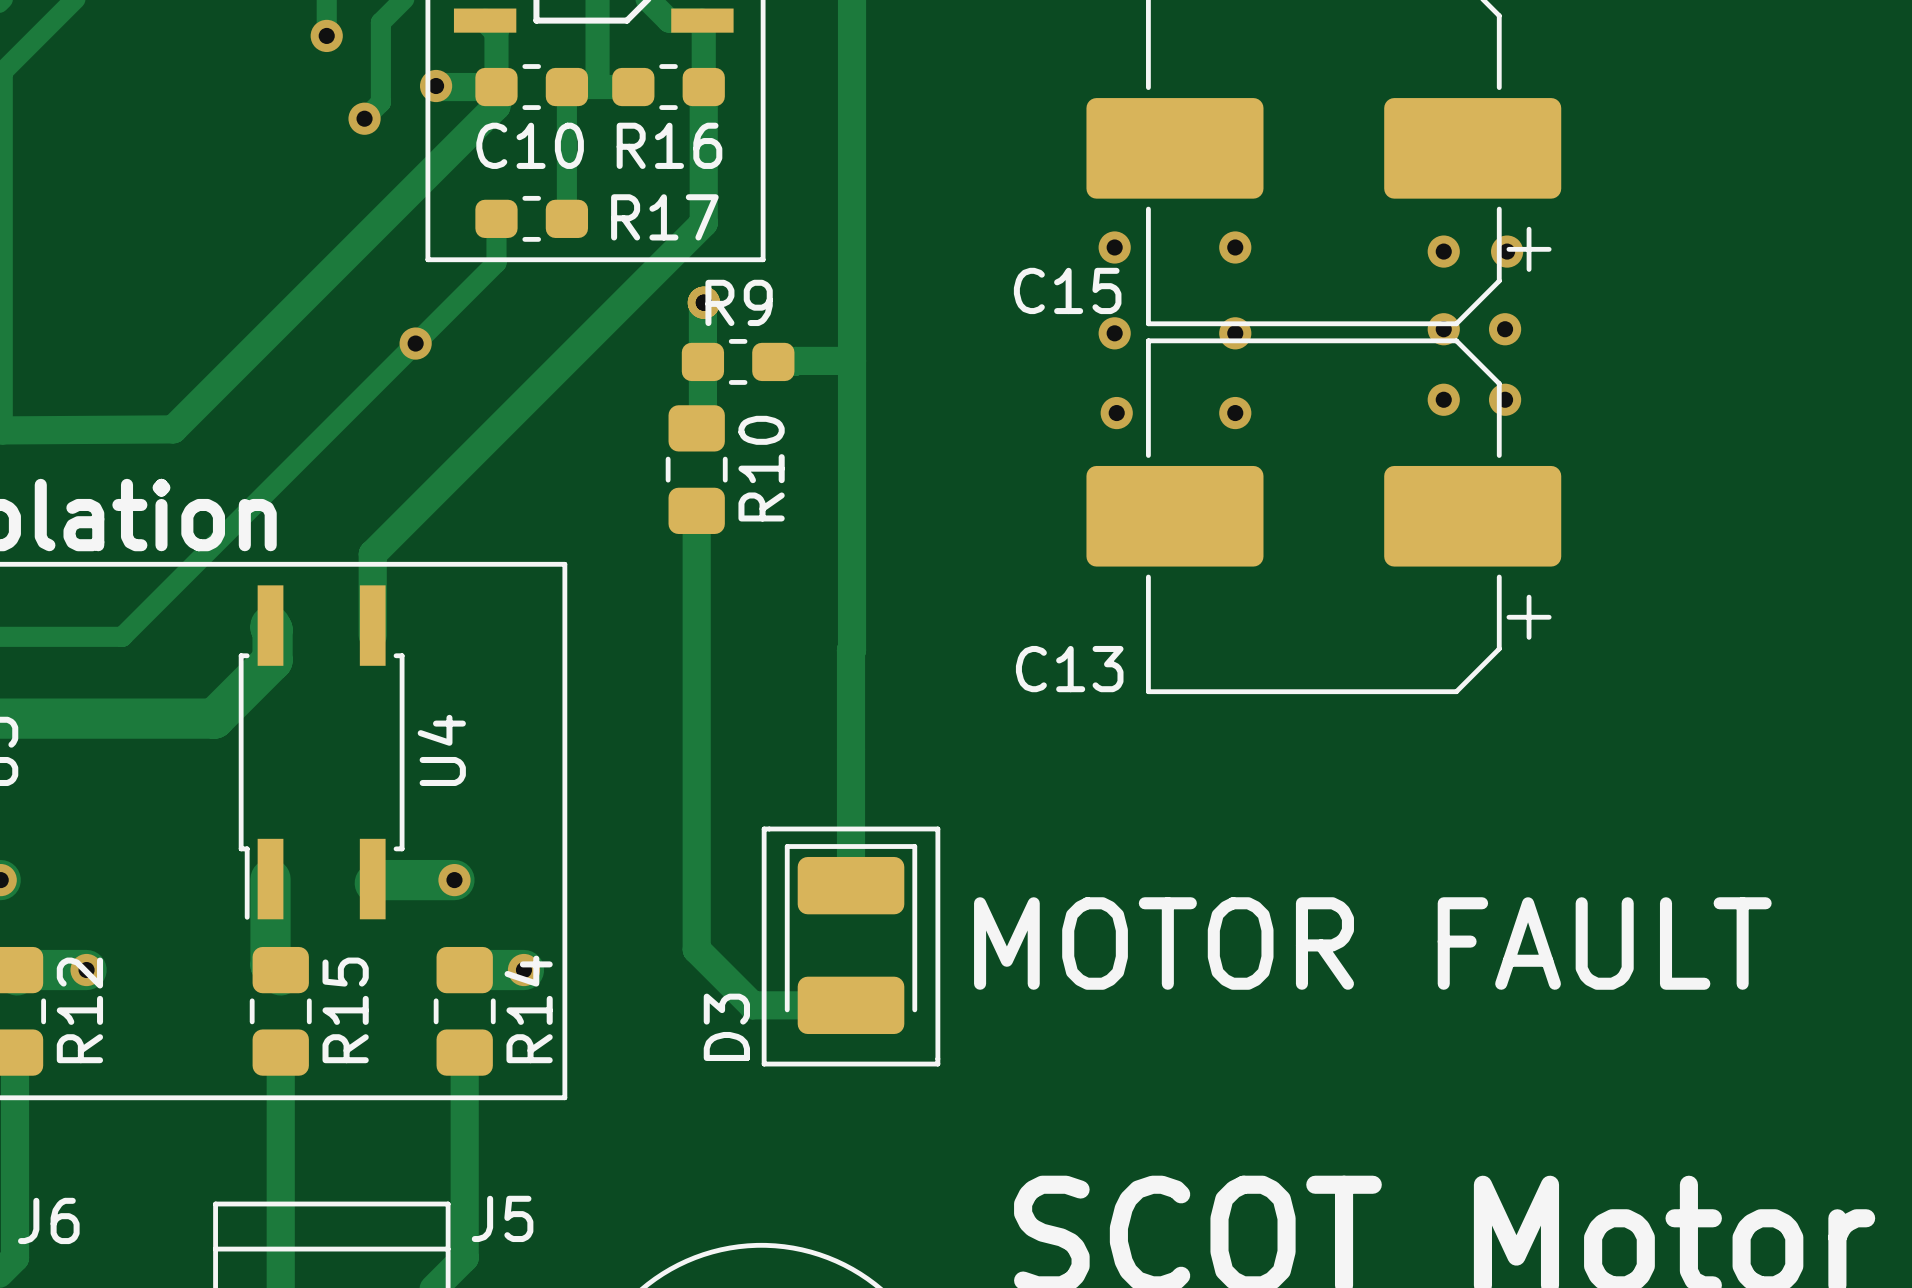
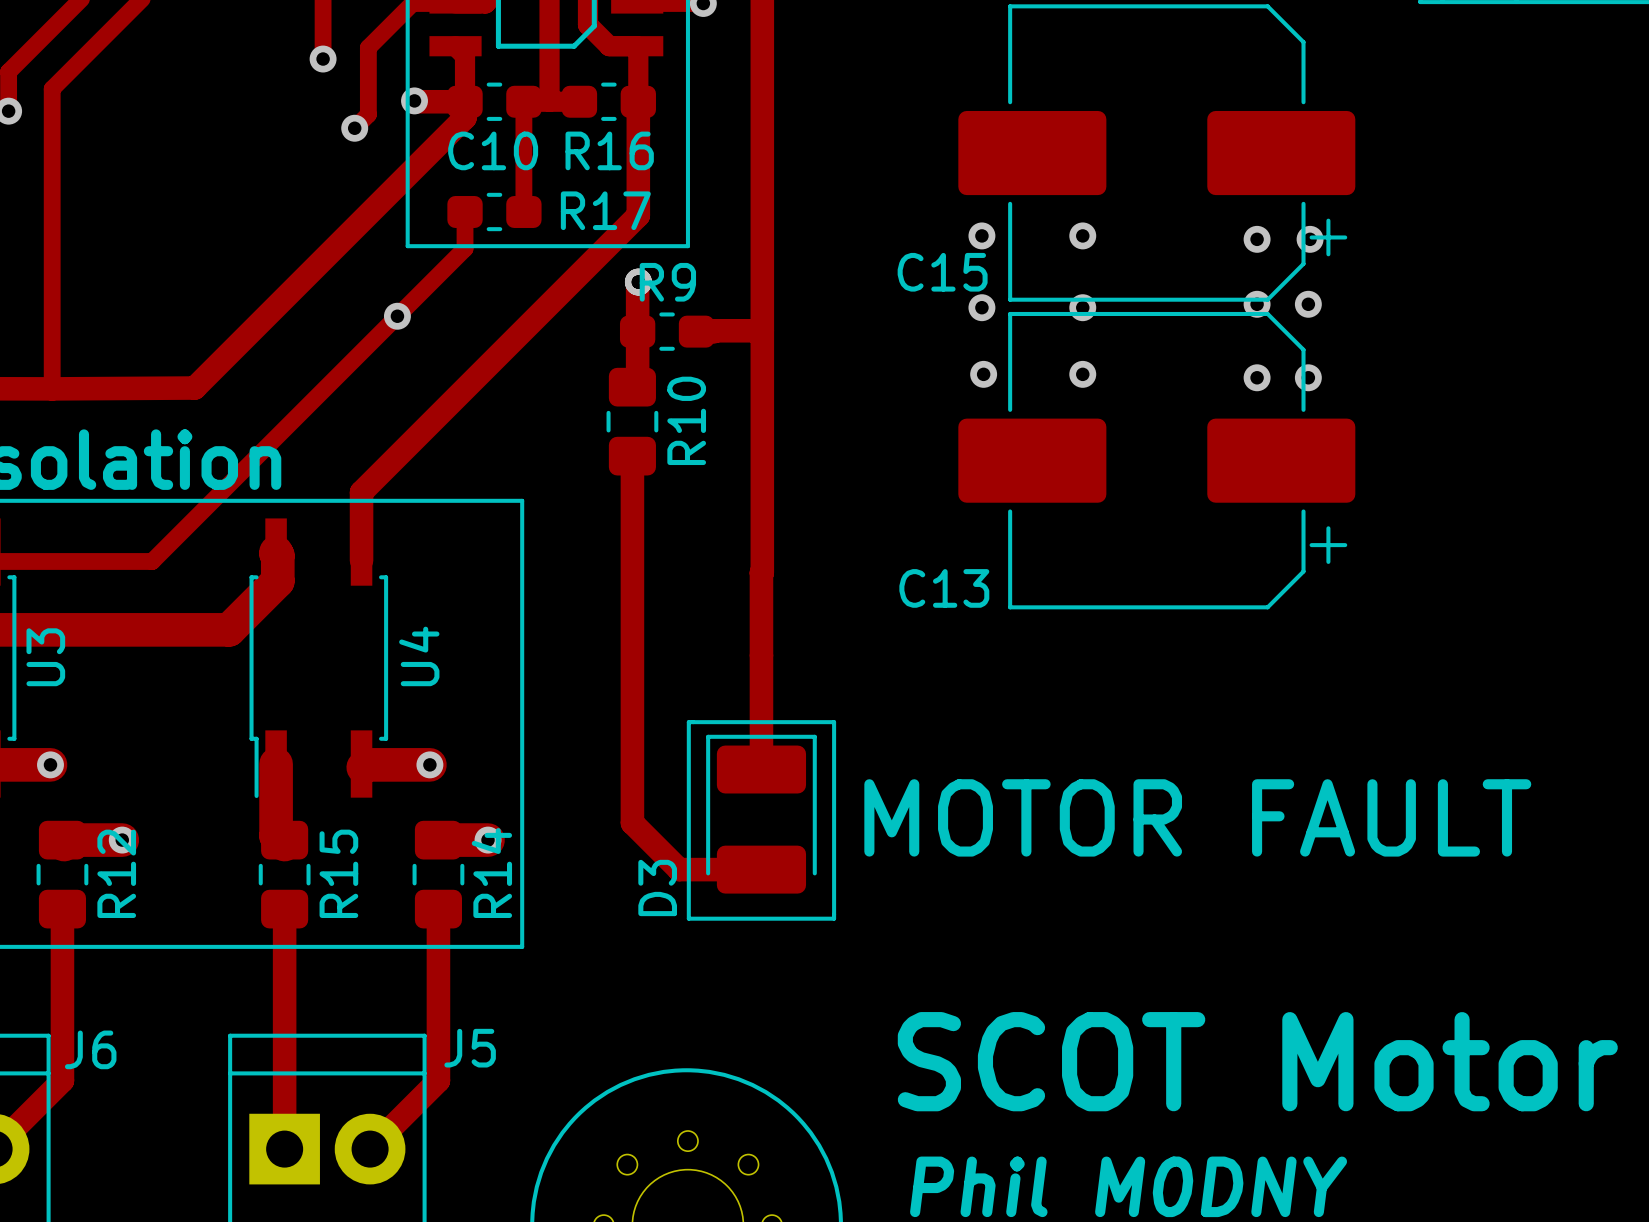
via position: (1443, 399) -> (1257, 377)
via position: (1505, 399) -> (1308, 377)

